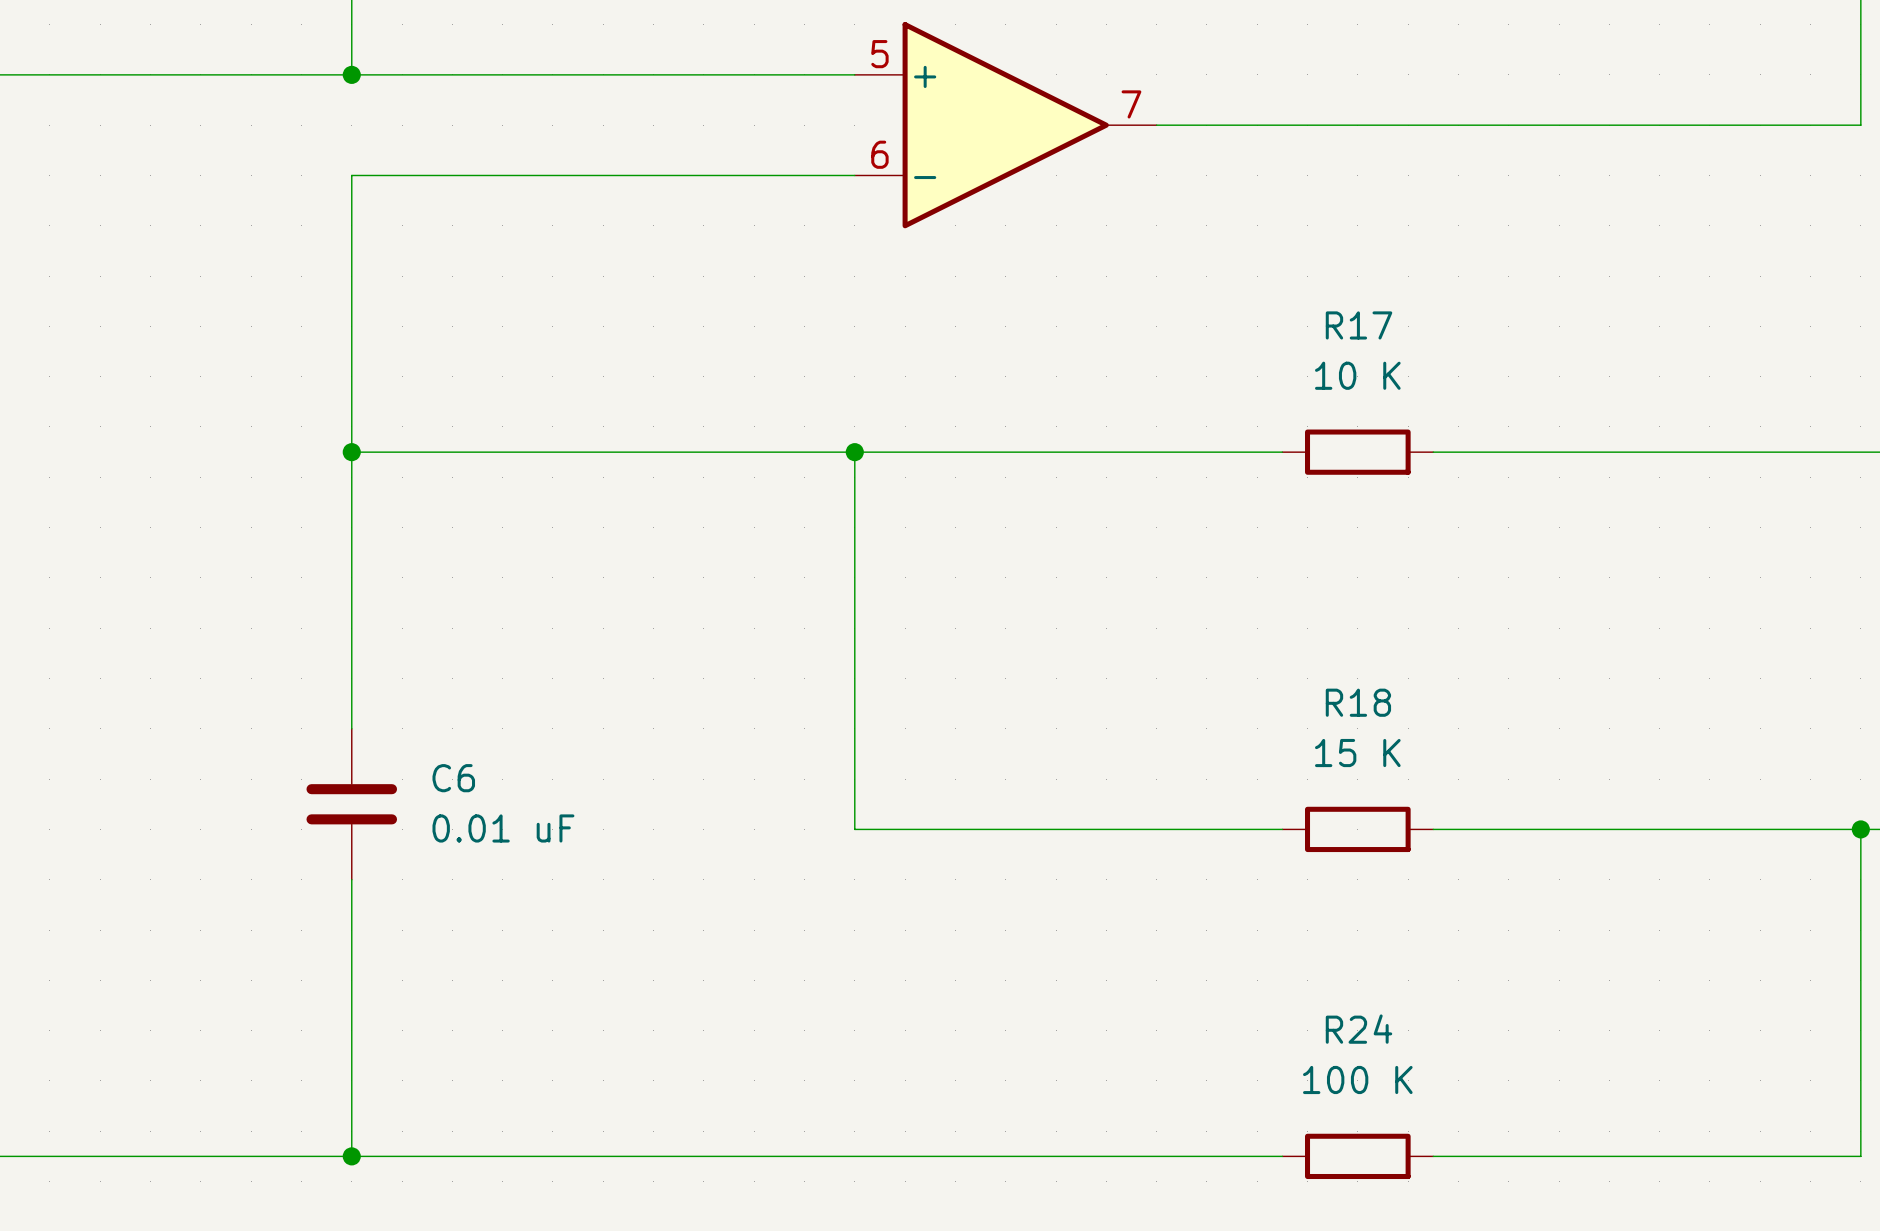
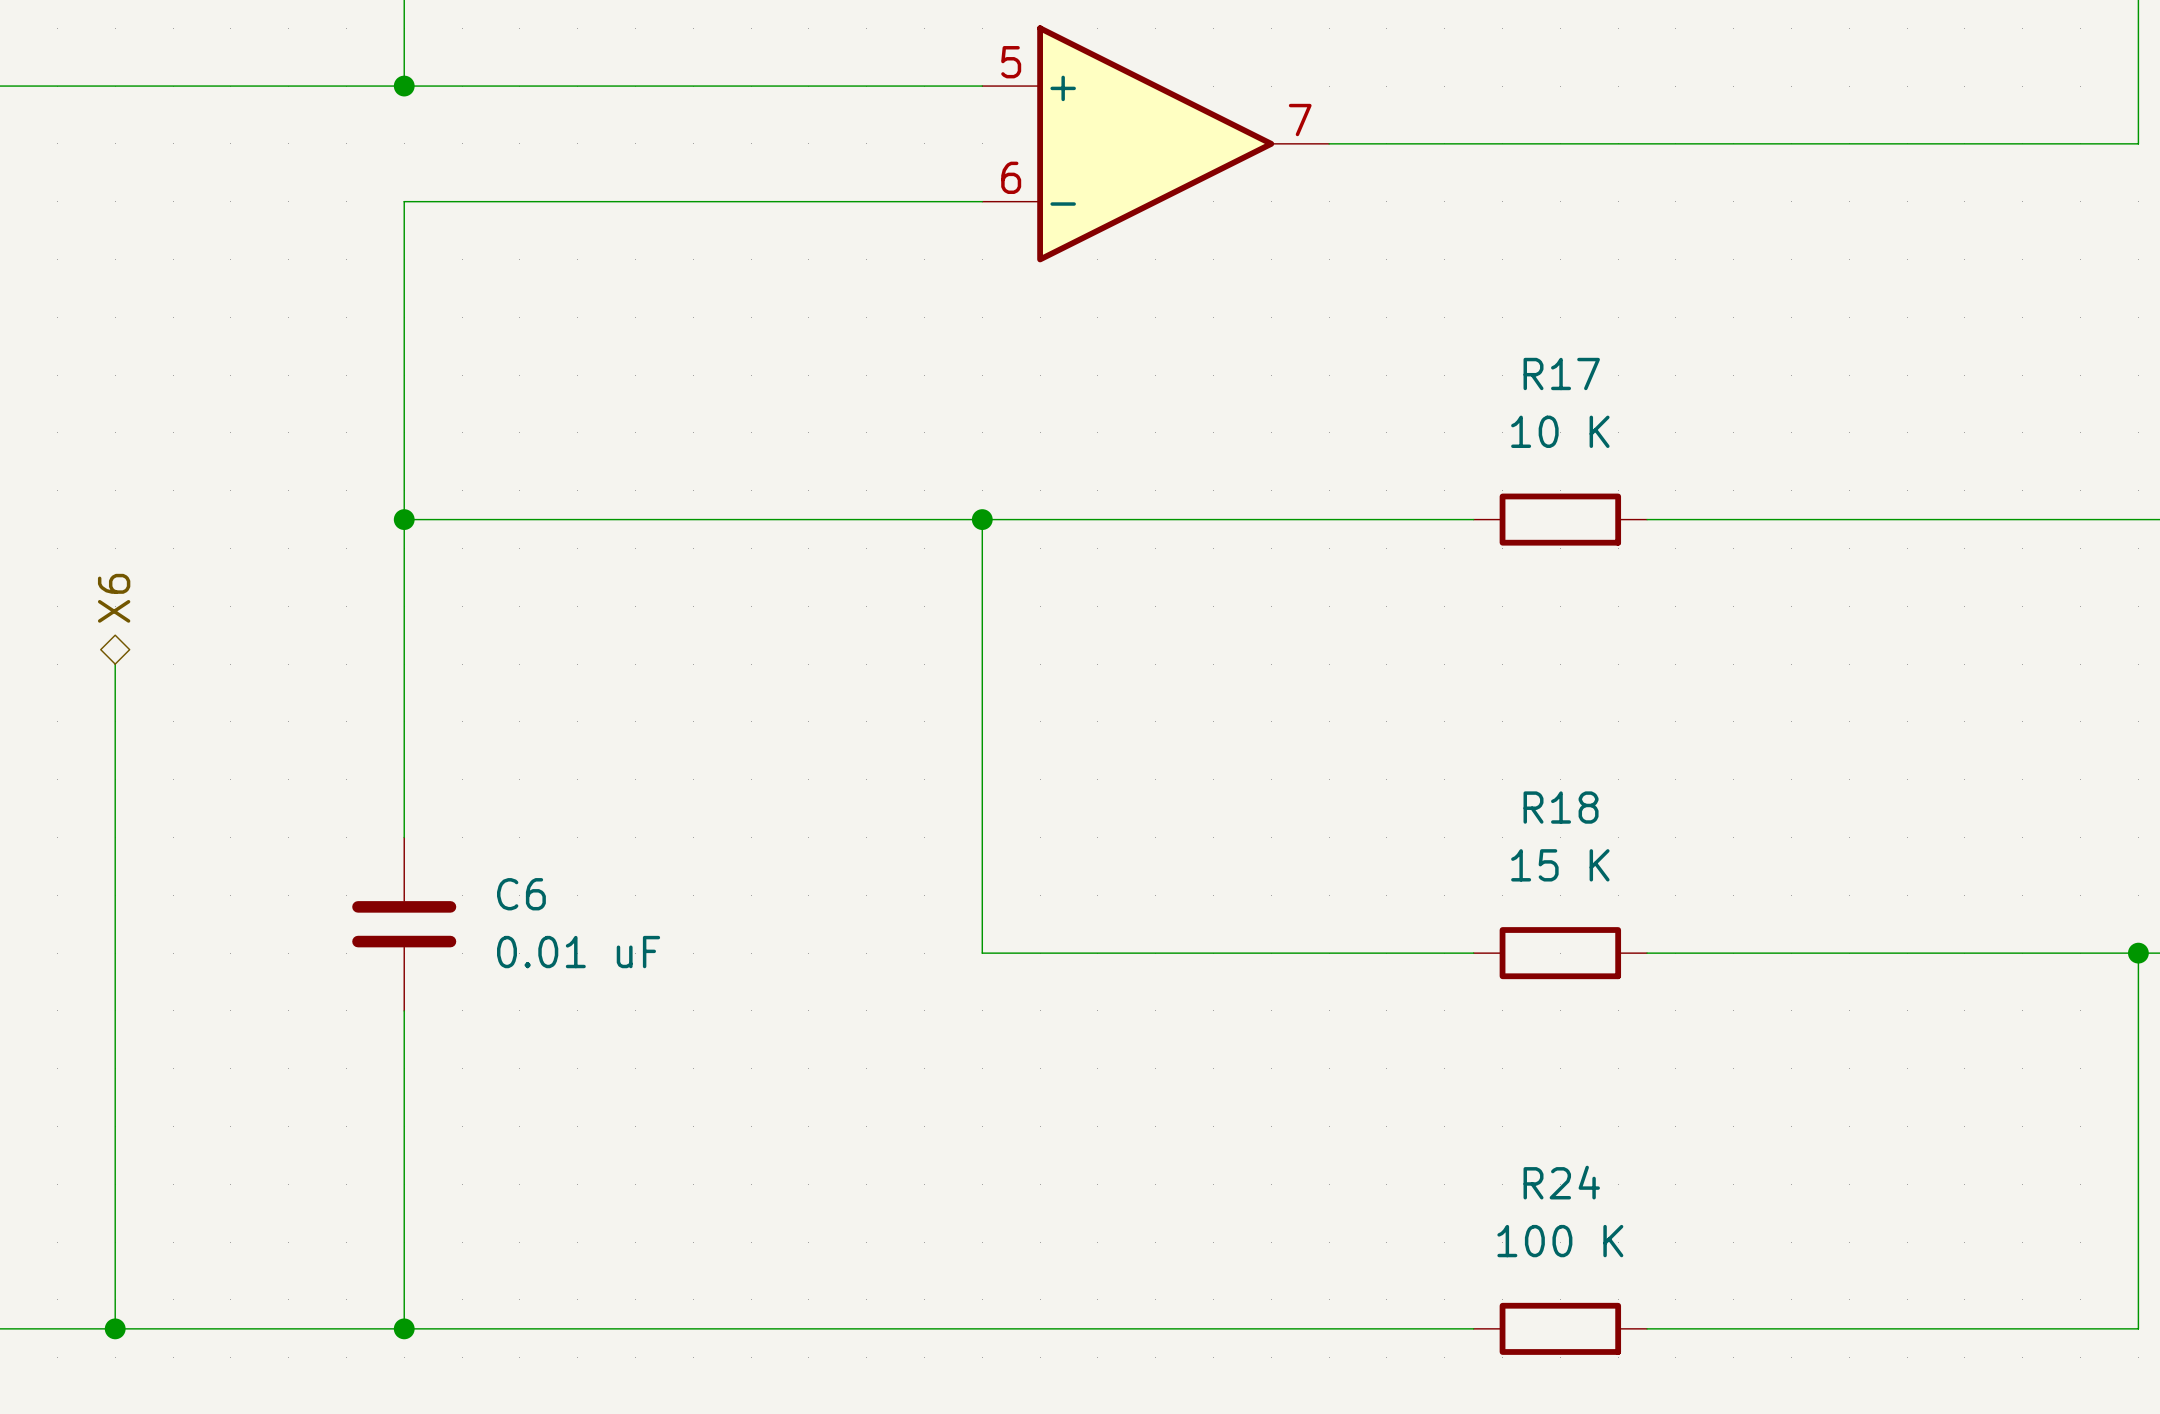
hierarchical label: none -> X6 (114, 598)
wire: none -> (115, 664) (115, 1328)
junction: none -> (115, 1328)

